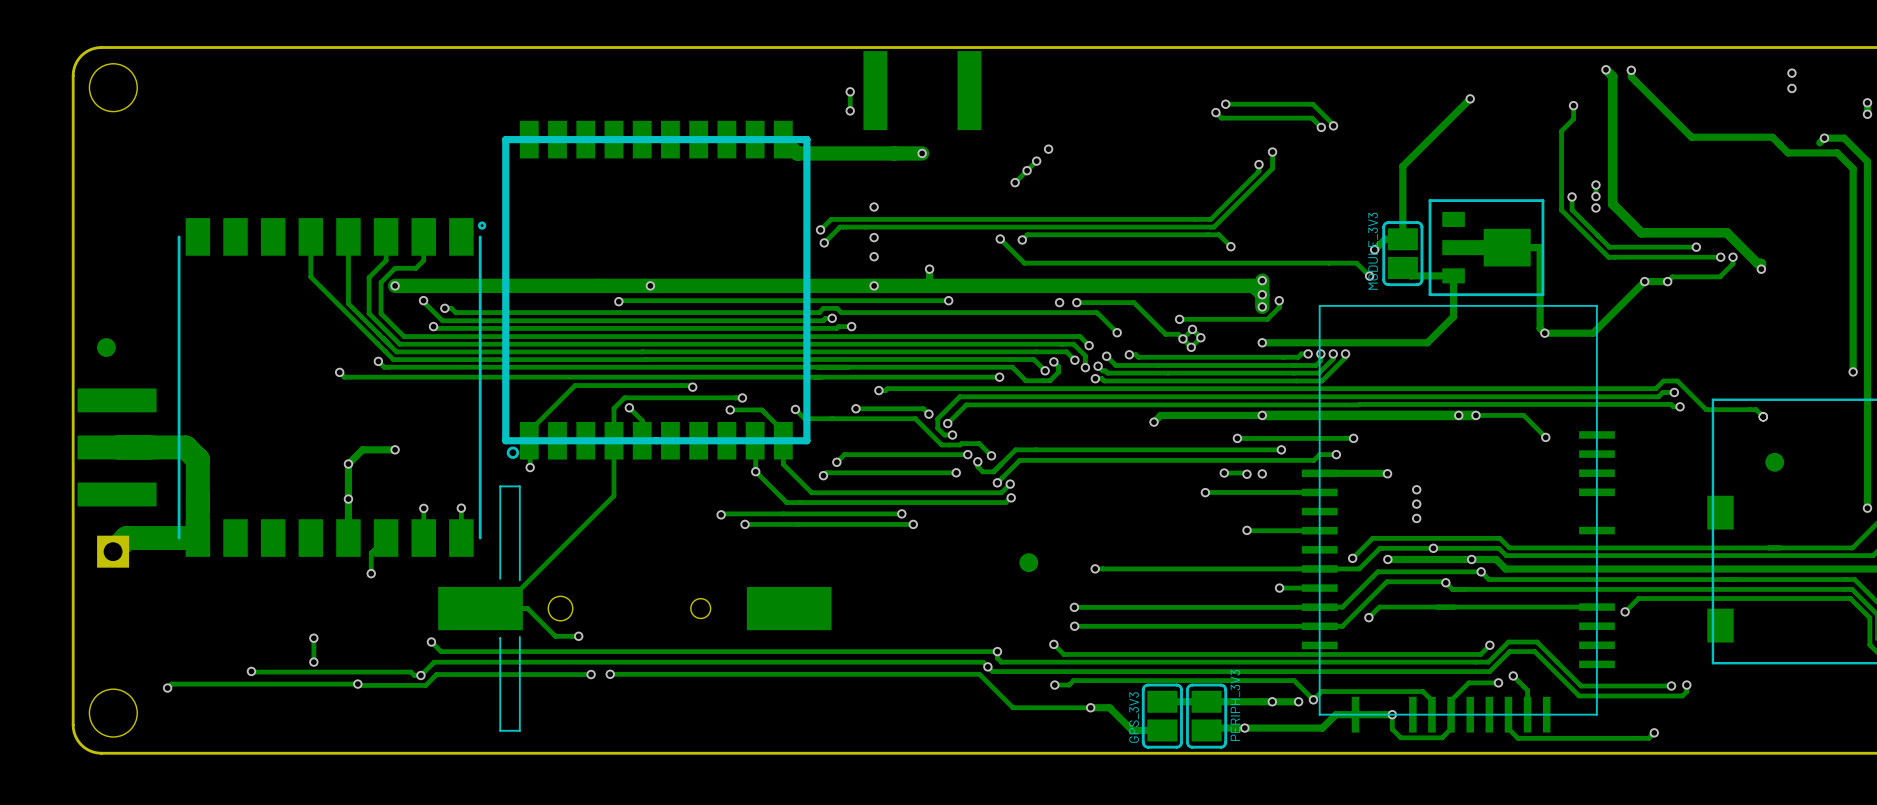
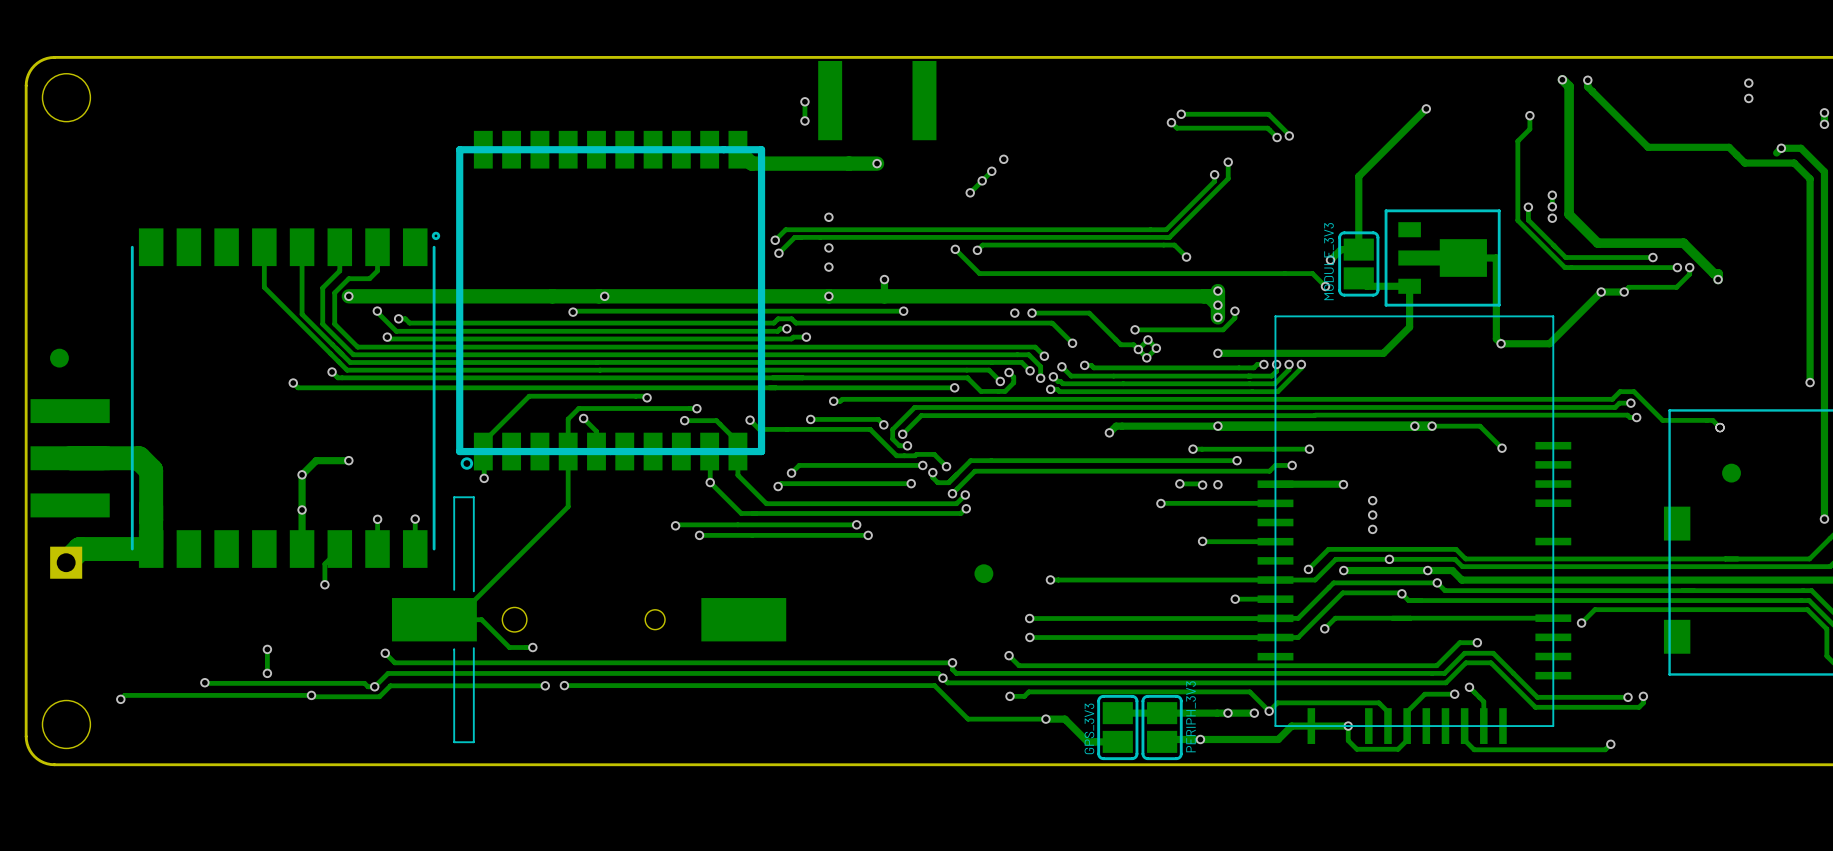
track: none -> (1477, 642) (1459, 642) (1446, 656)
via position: (1489, 645) -> (1477, 642)

